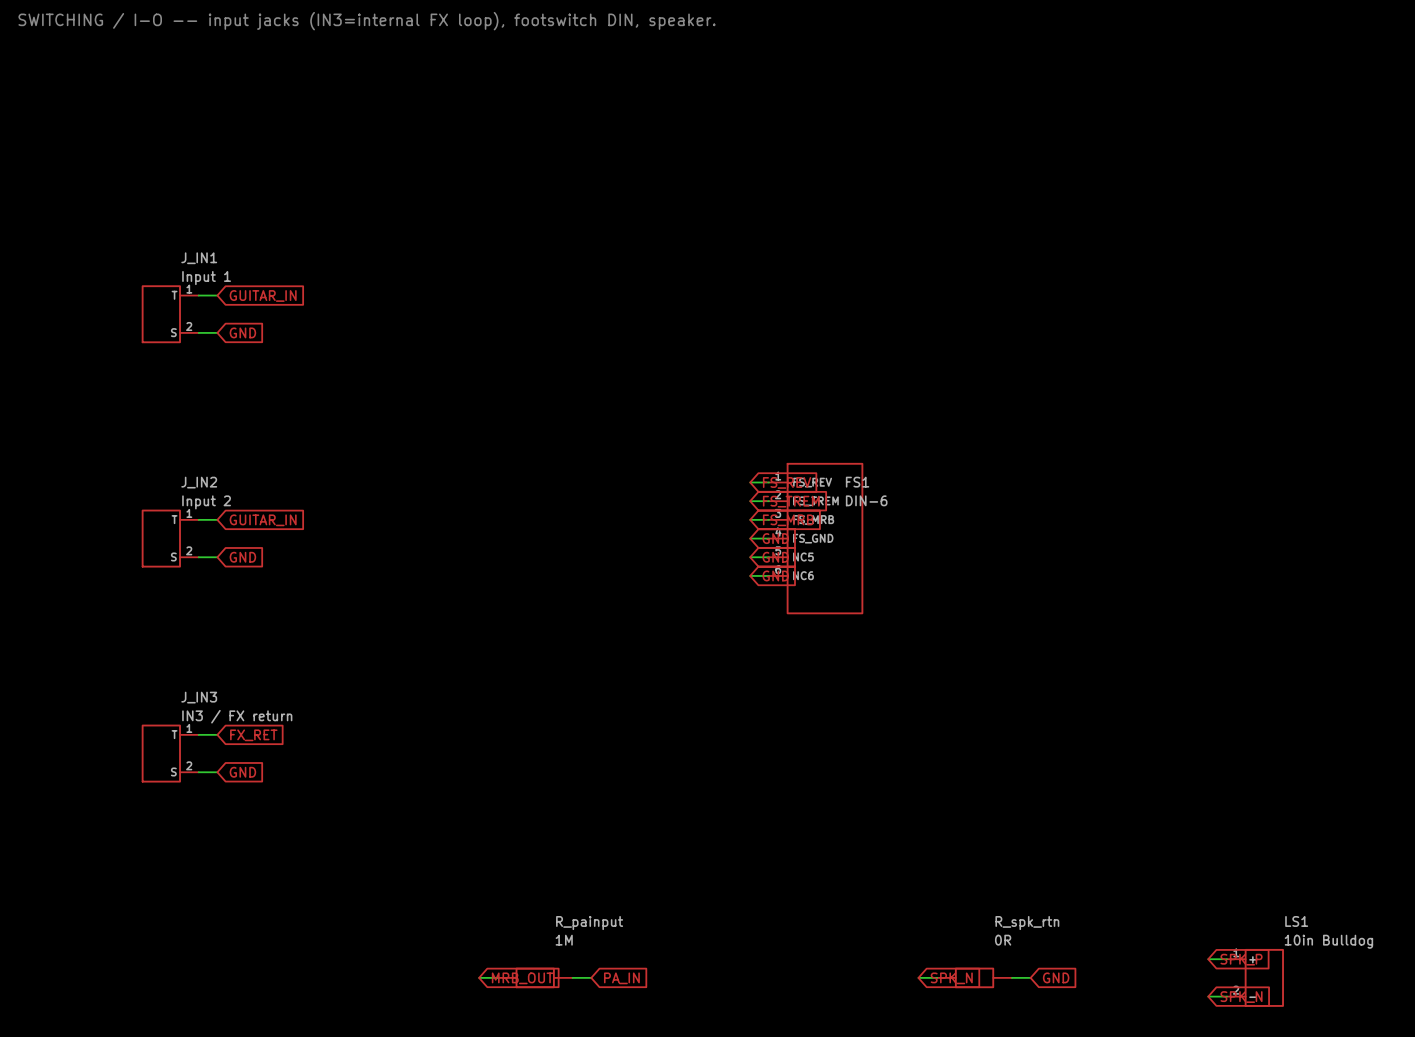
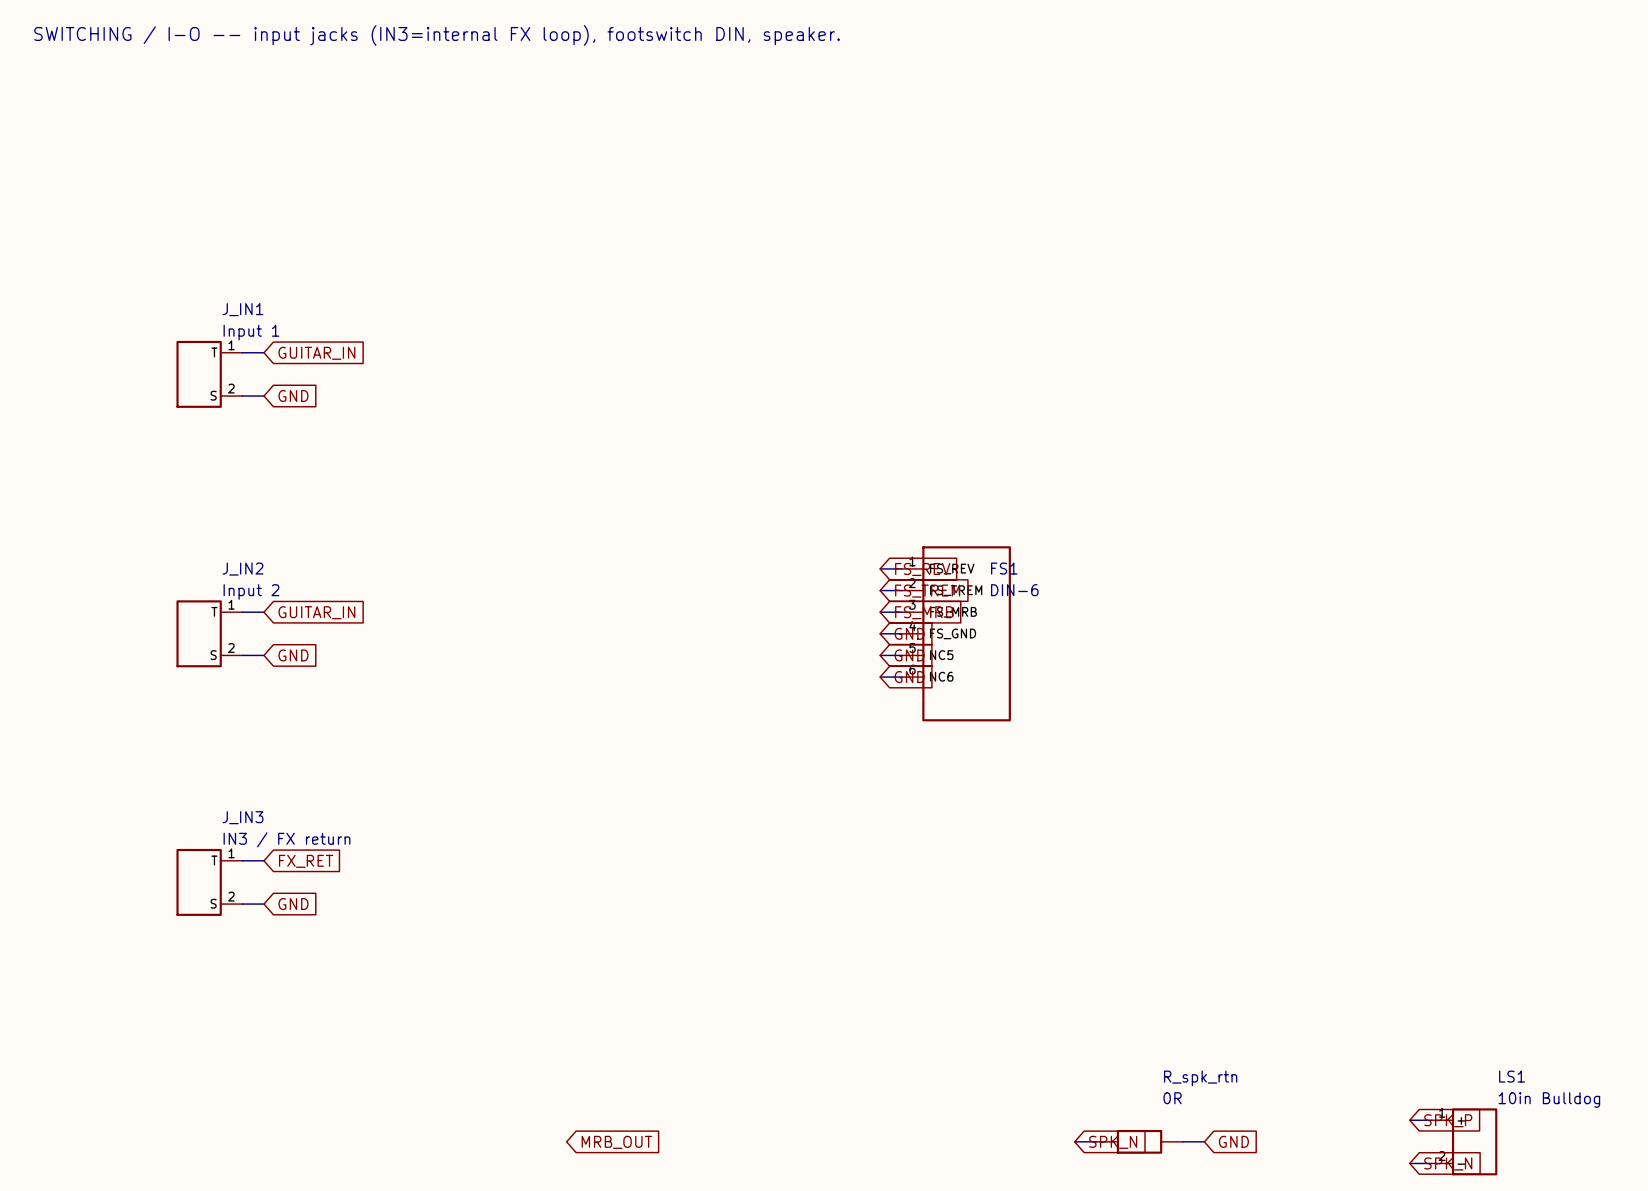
wire: (479, 977) (497, 977) -> none
R_painput: 1M (535, 977) -> none
wire: (572, 977) (591, 977) -> none
global label: PA_IN (621, 978) -> none

